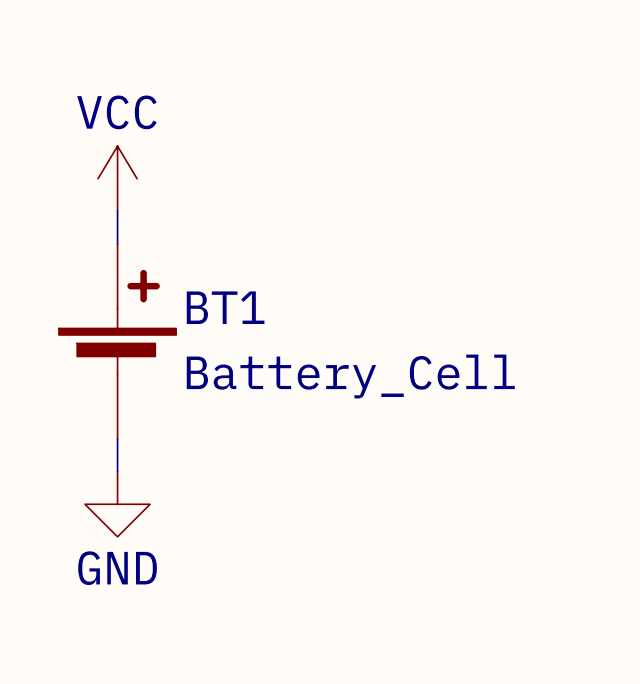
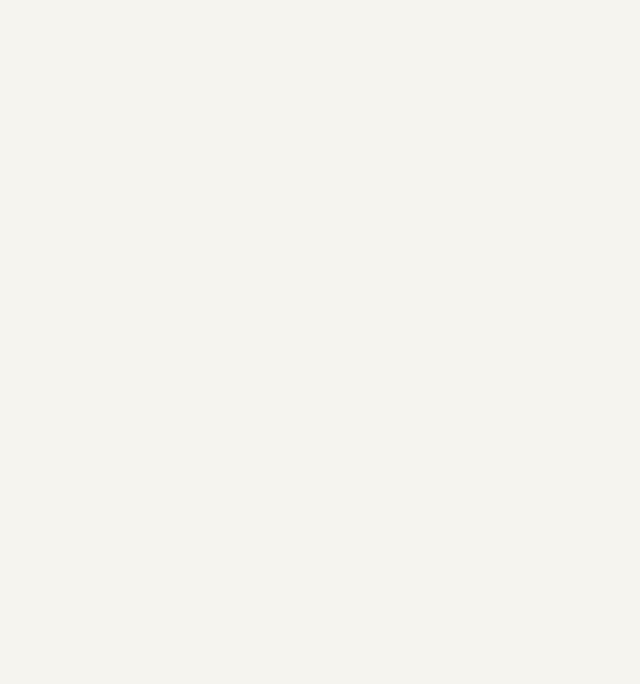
power symbol: VCC (117, 178) -> none
wire: (117, 211) (117, 243) -> none
BT1: Battery_Cell (117, 341) -> none
wire: (117, 439) (117, 471) -> none
power symbol: GND (117, 504) -> none

